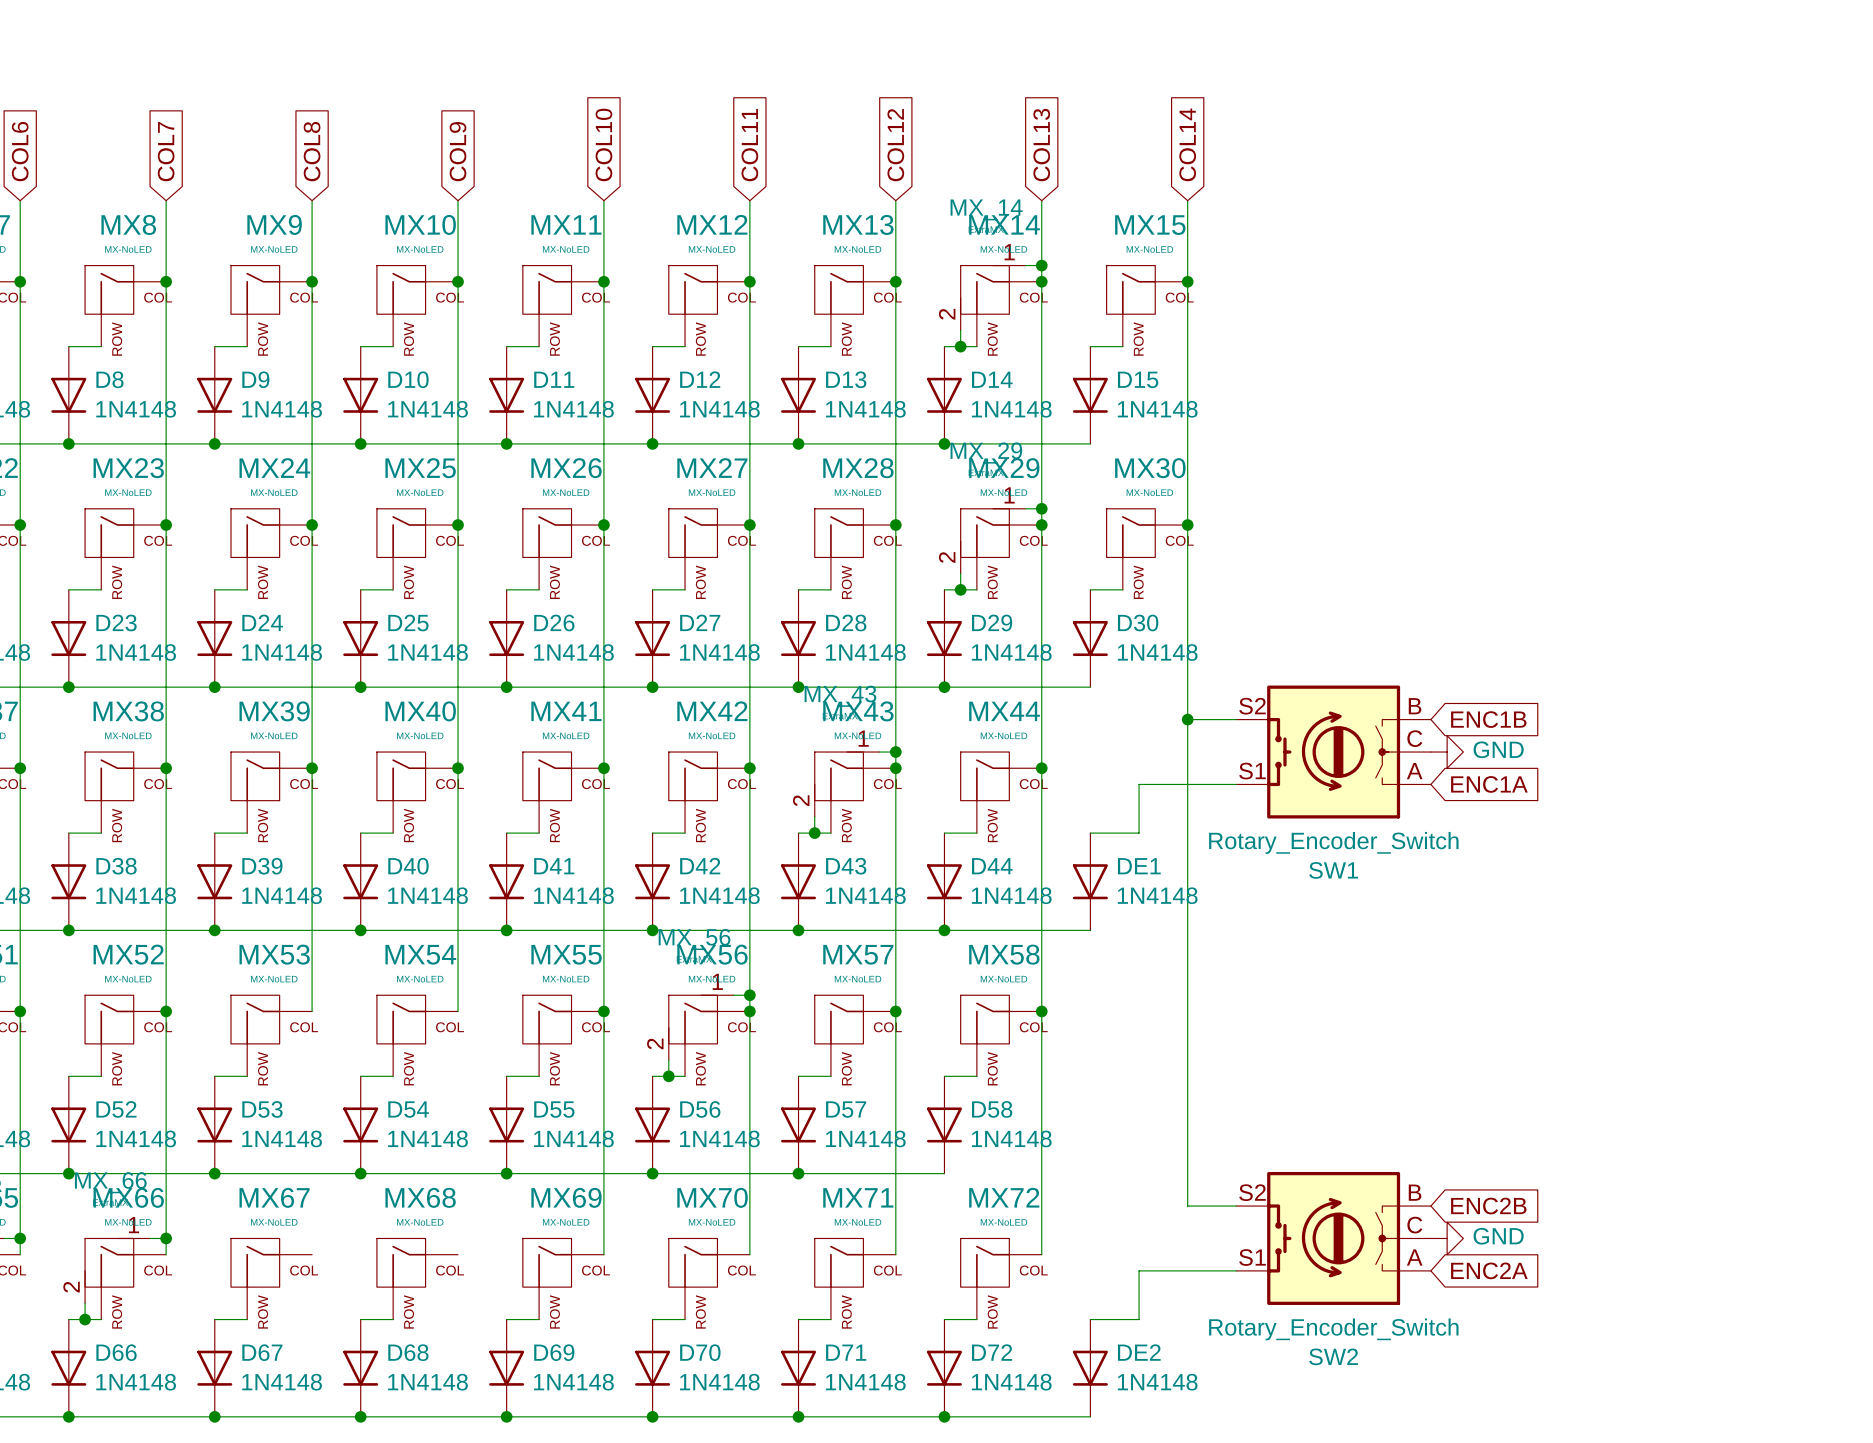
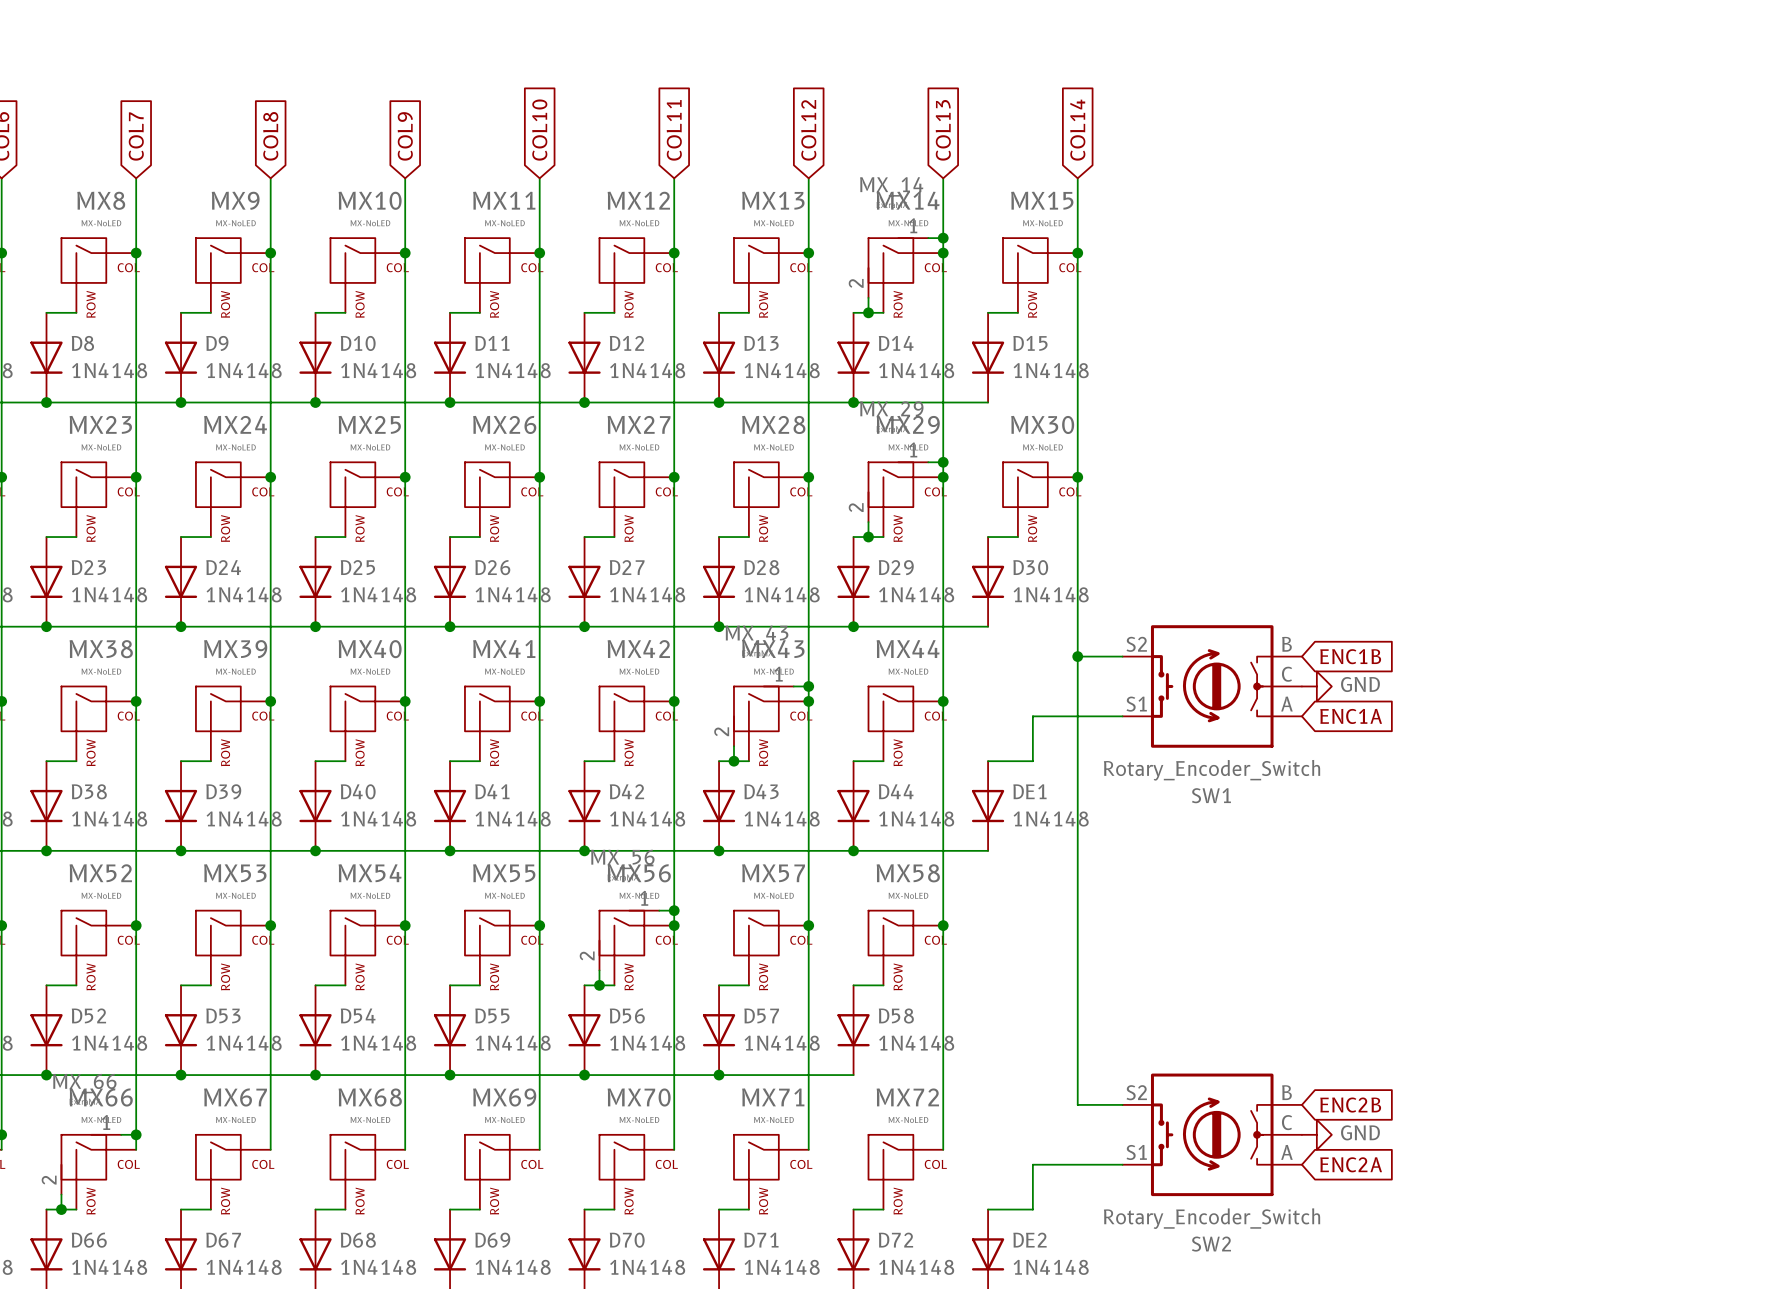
wire: none -> (270, 925) (270, 1149)
junction: none -> (270, 925)
wire: none -> (405, 925) (405, 1149)
junction: none -> (405, 925)

